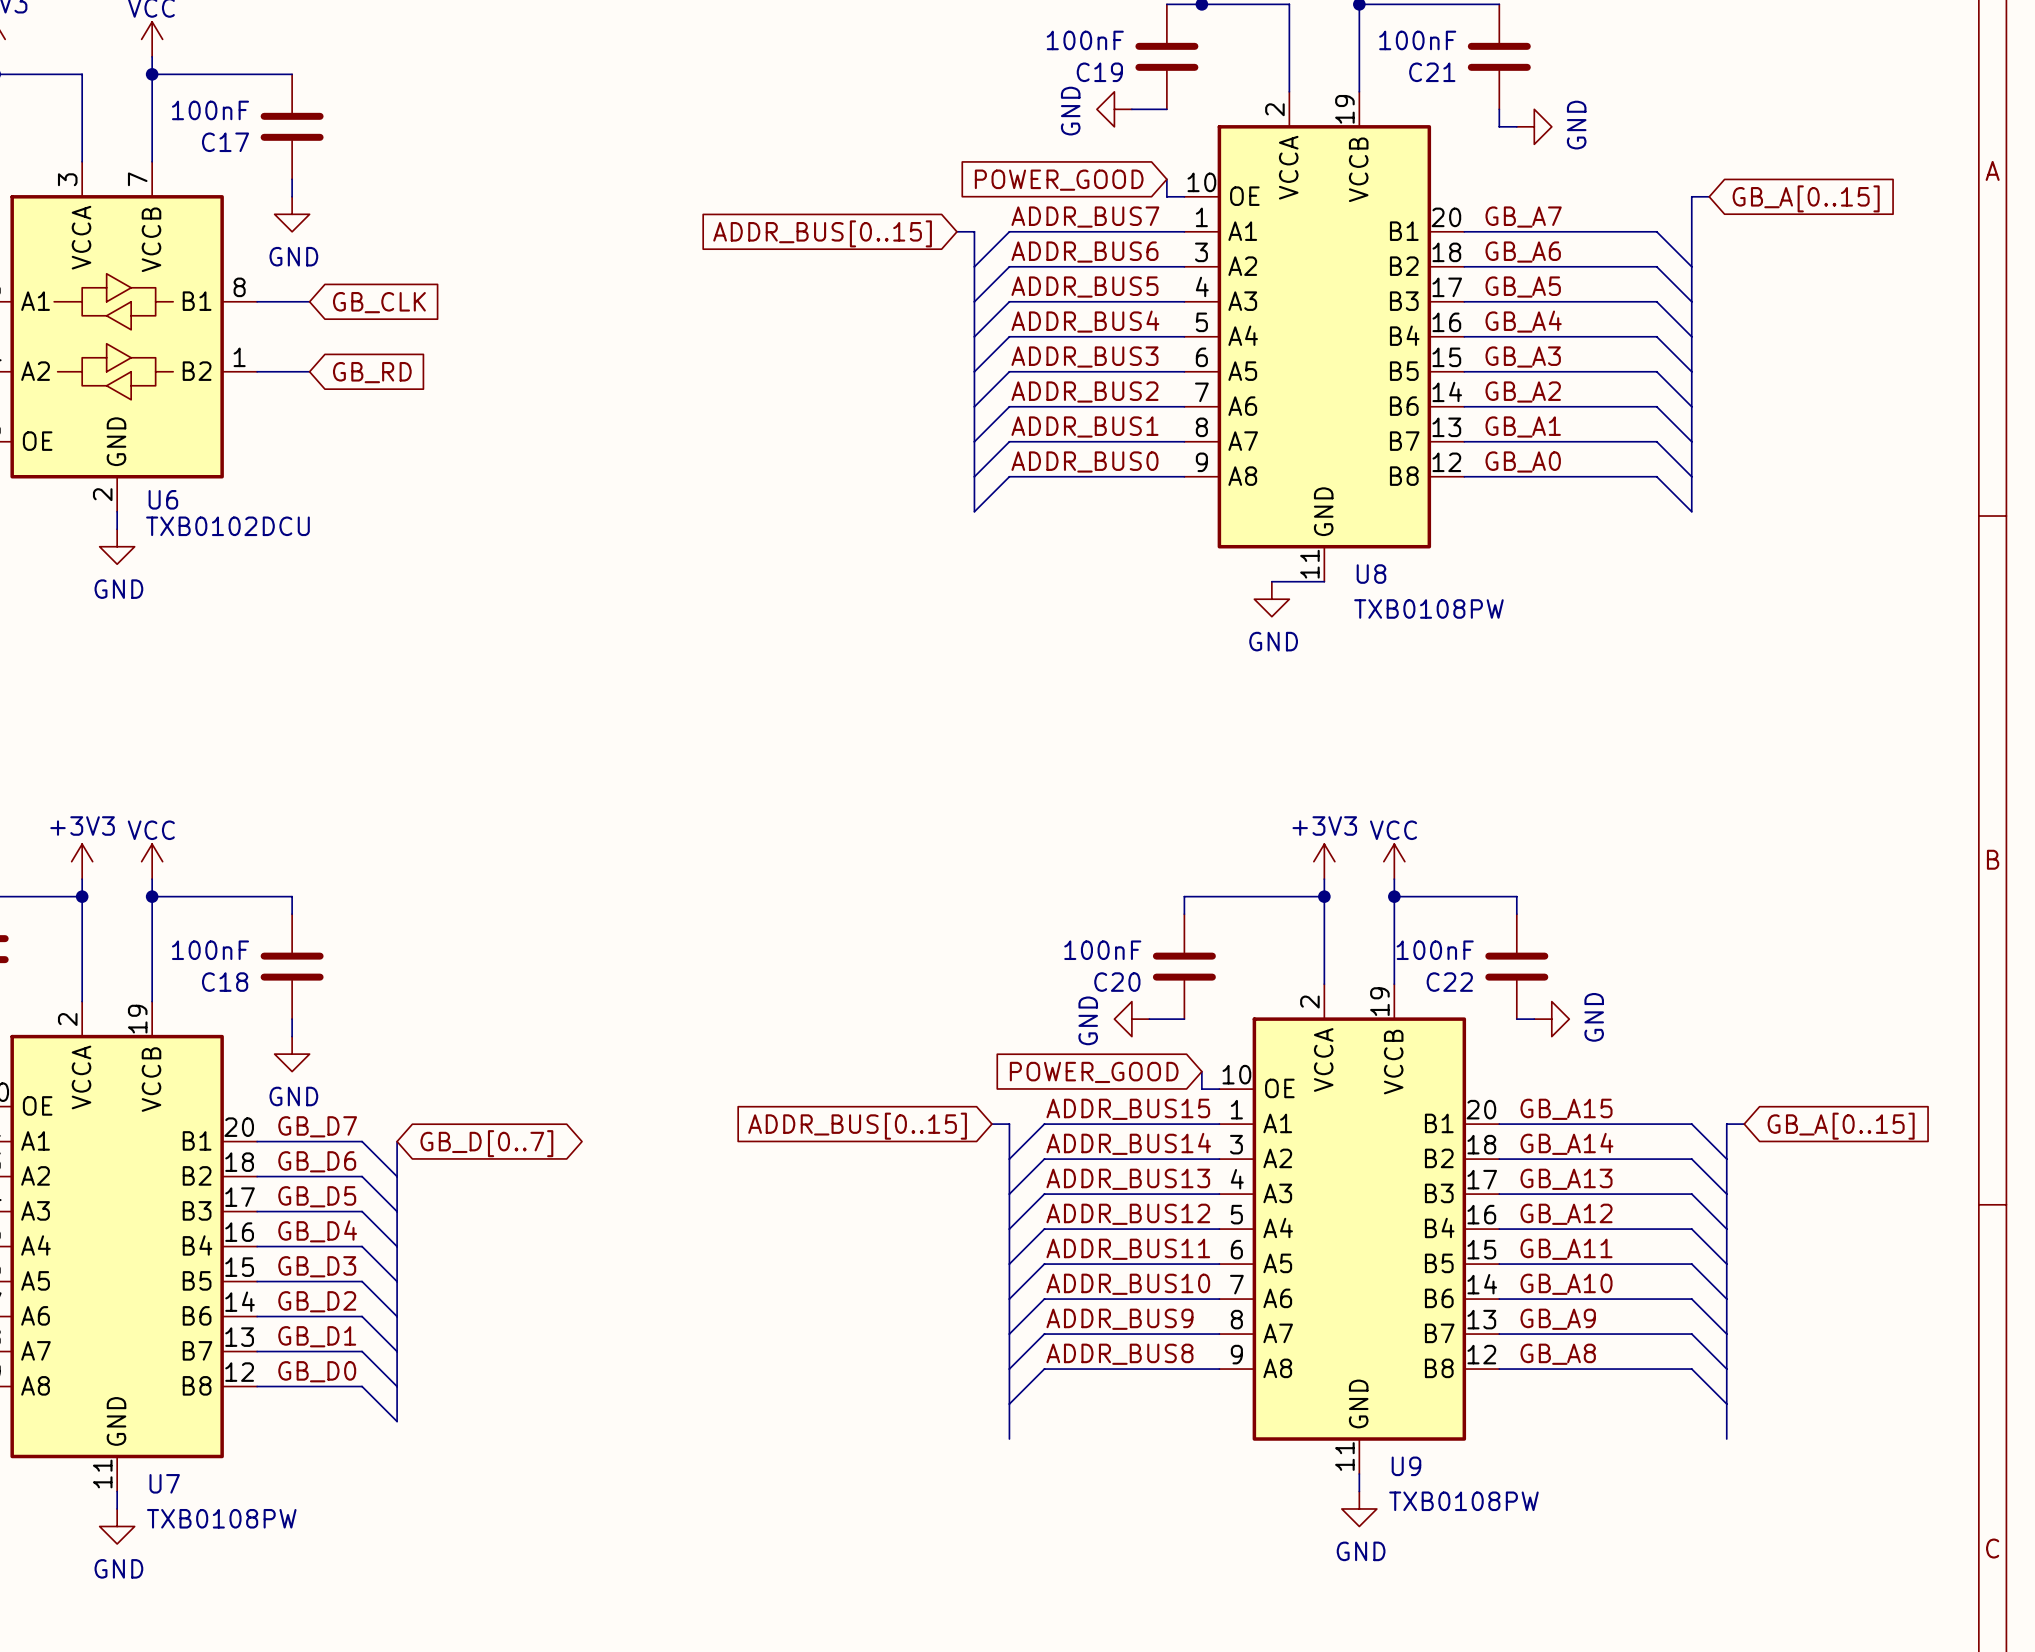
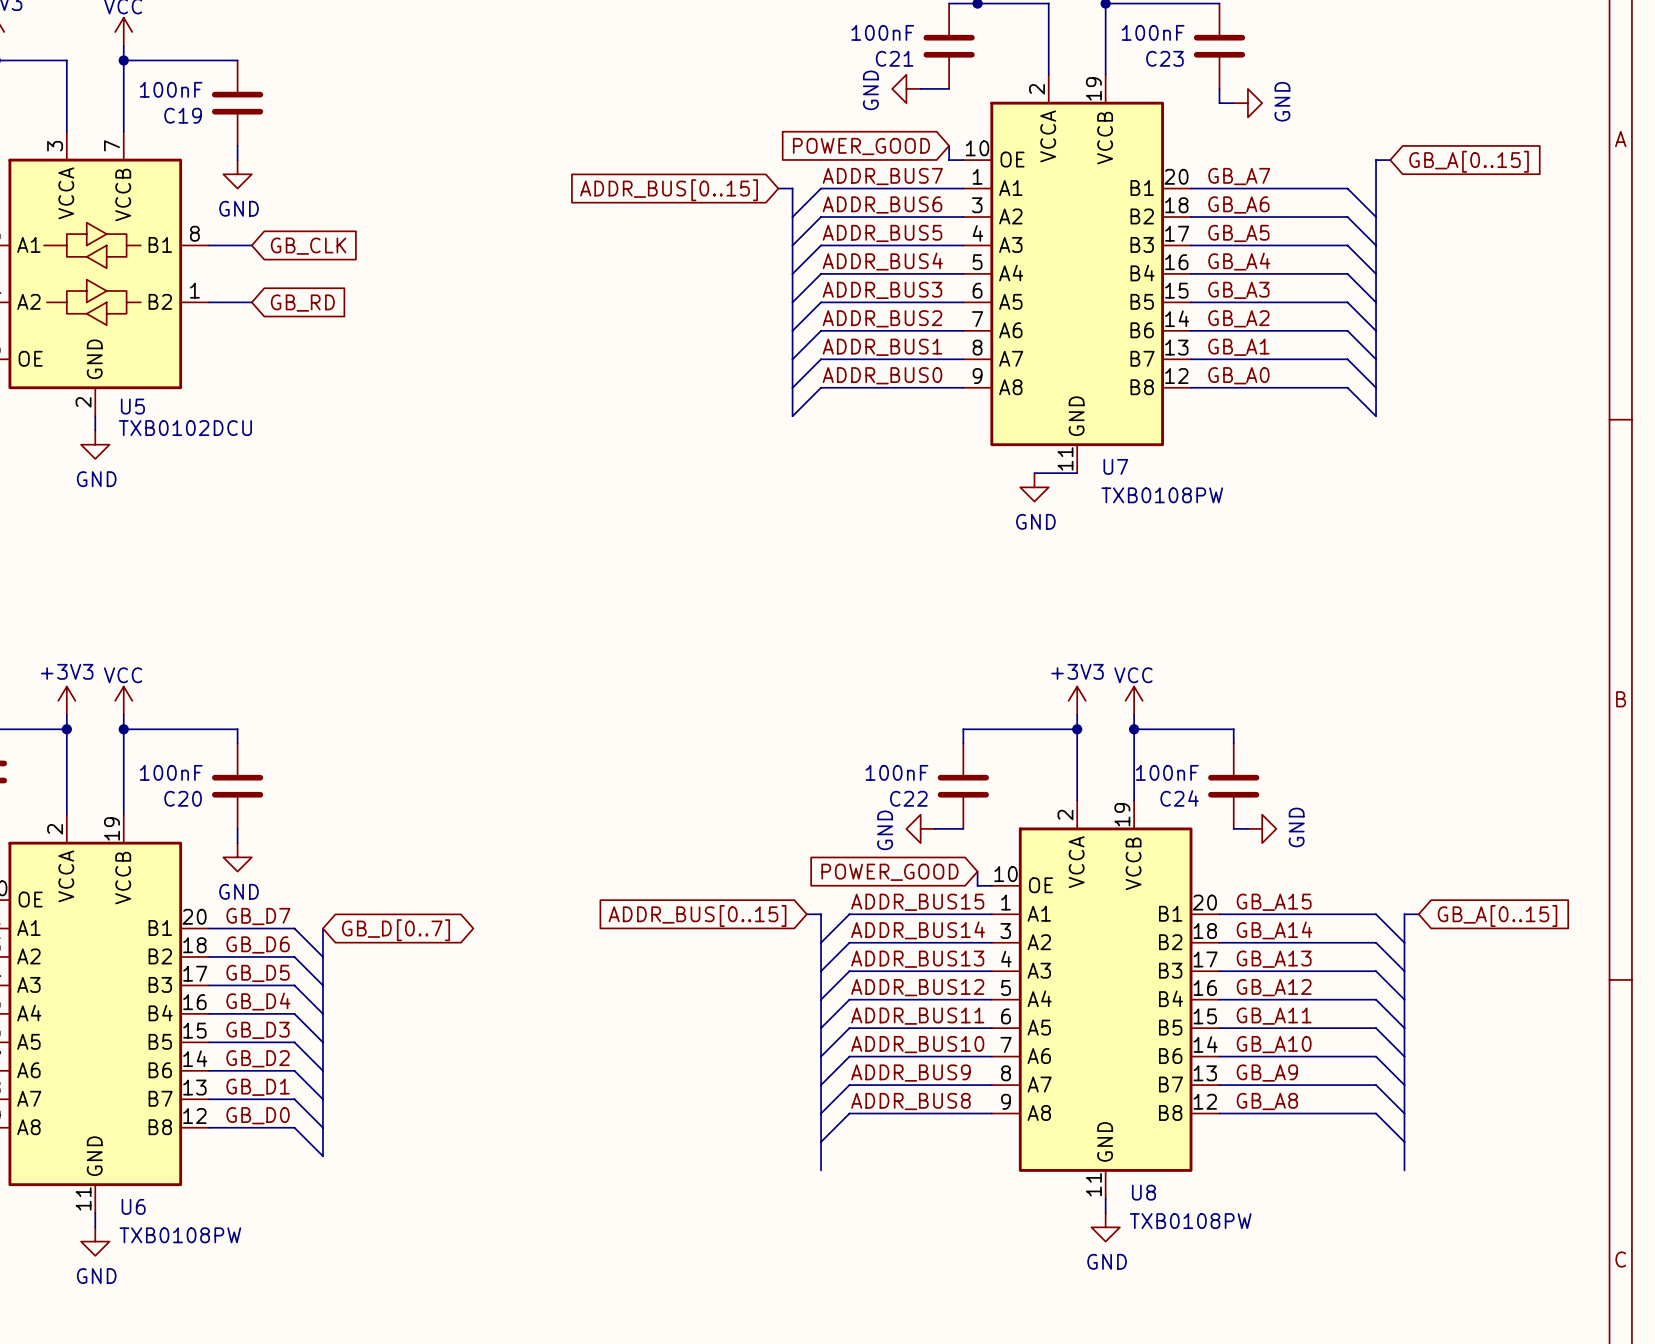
C19 name: C19 (1099, 72) -> C21 (894, 58)
C21 name: C21 (1432, 72) -> C23 (1164, 58)
C17 name: C17 (225, 142) -> C19 (183, 115)
U6 name: U6 (163, 499) -> U5 (132, 406)
U8 name: U8 (1371, 574) -> U7 (1115, 466)
C18 name: C18 (225, 982) -> C20 (183, 798)
C20 name: C20 (1117, 982) -> C22 (908, 798)
C22 name: C22 (1449, 982) -> C24 (1179, 798)
U9 name: U9 (1406, 1466) -> U8 (1143, 1192)
U7 name: U7 (164, 1483) -> U6 (133, 1206)

